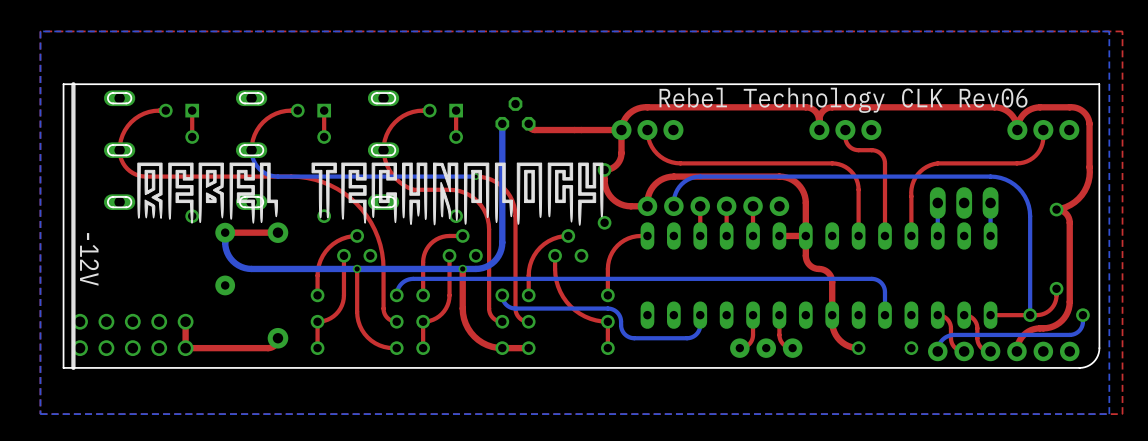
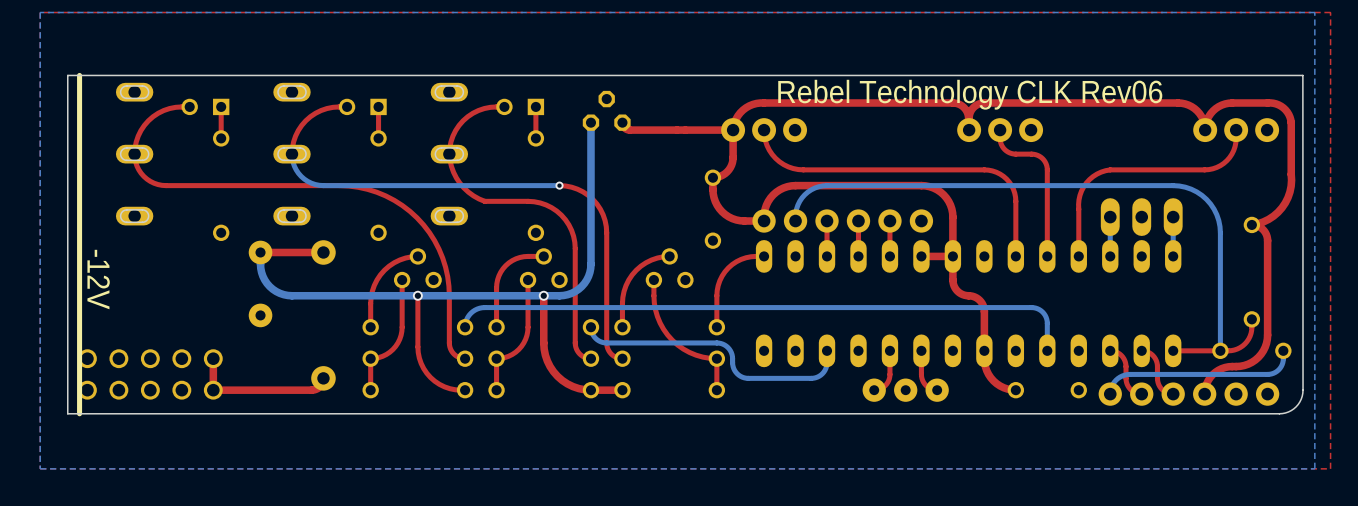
drawing: [137, 162, 278, 224] -> none
drawing: [311, 162, 604, 226] -> none

